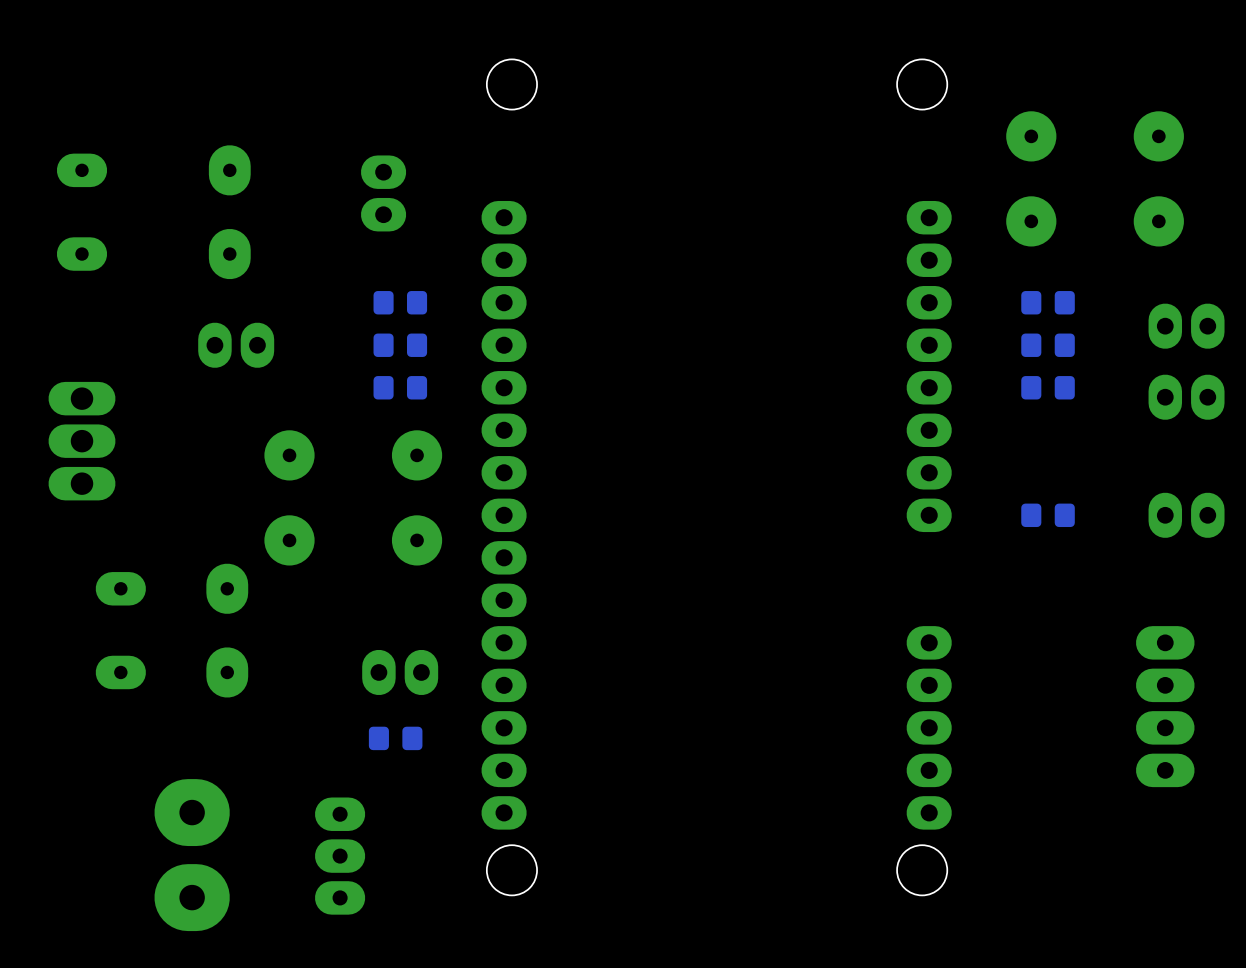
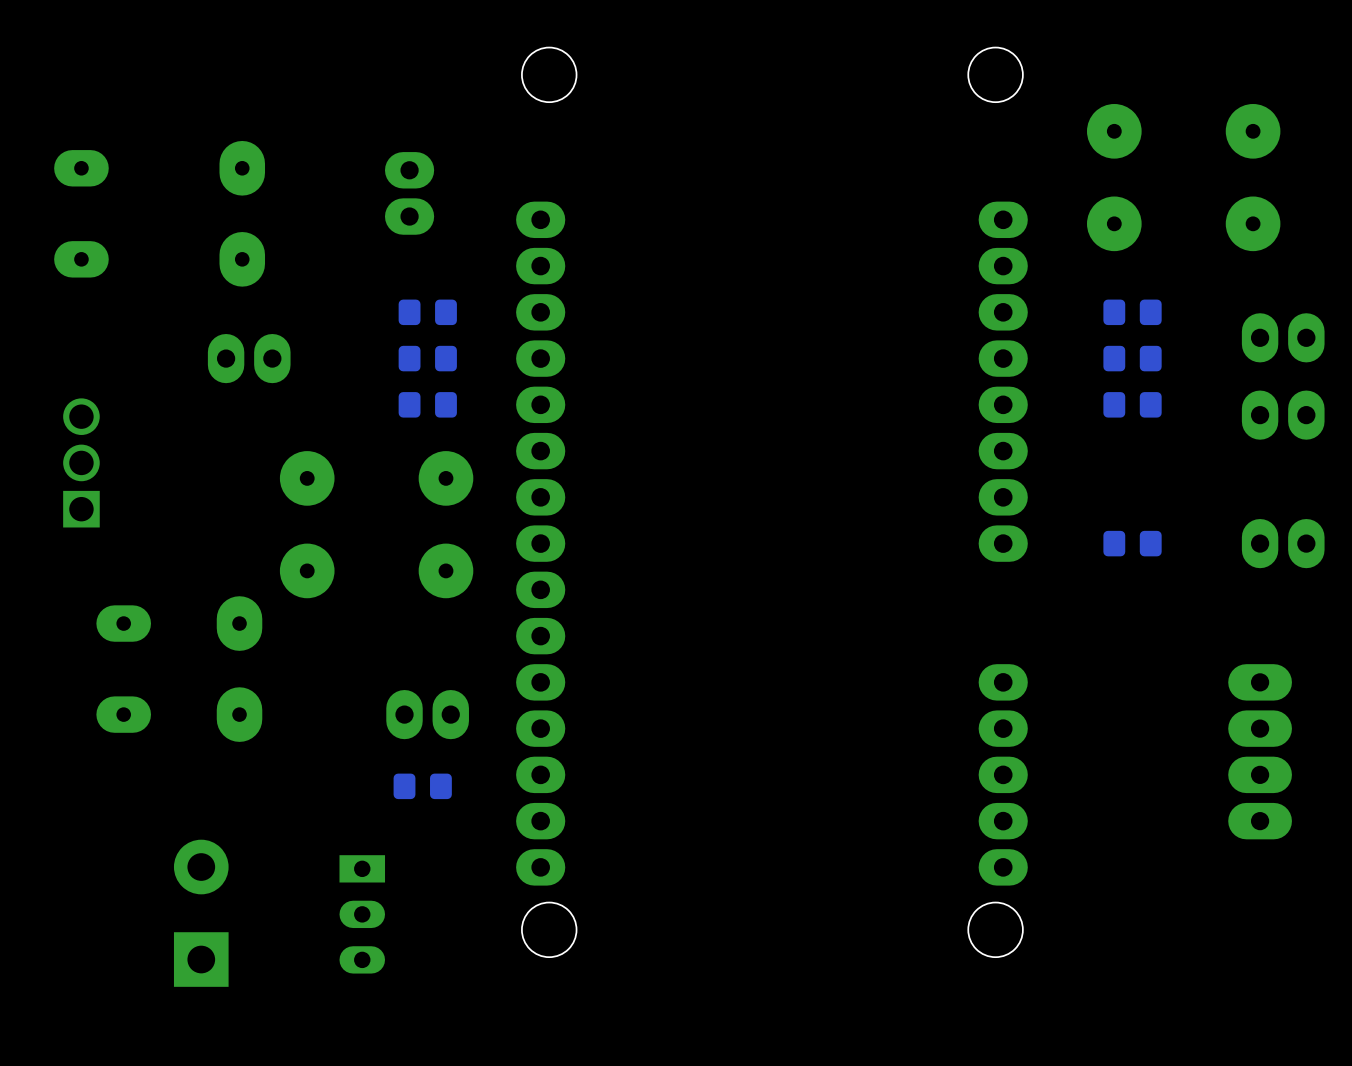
part footprint: [48, 381, 116, 501] -> [63, 398, 100, 528]
part footprint: [154, 779, 230, 932] -> [173, 839, 229, 987]
part footprint: [314, 797, 366, 915] -> [339, 855, 386, 974]

